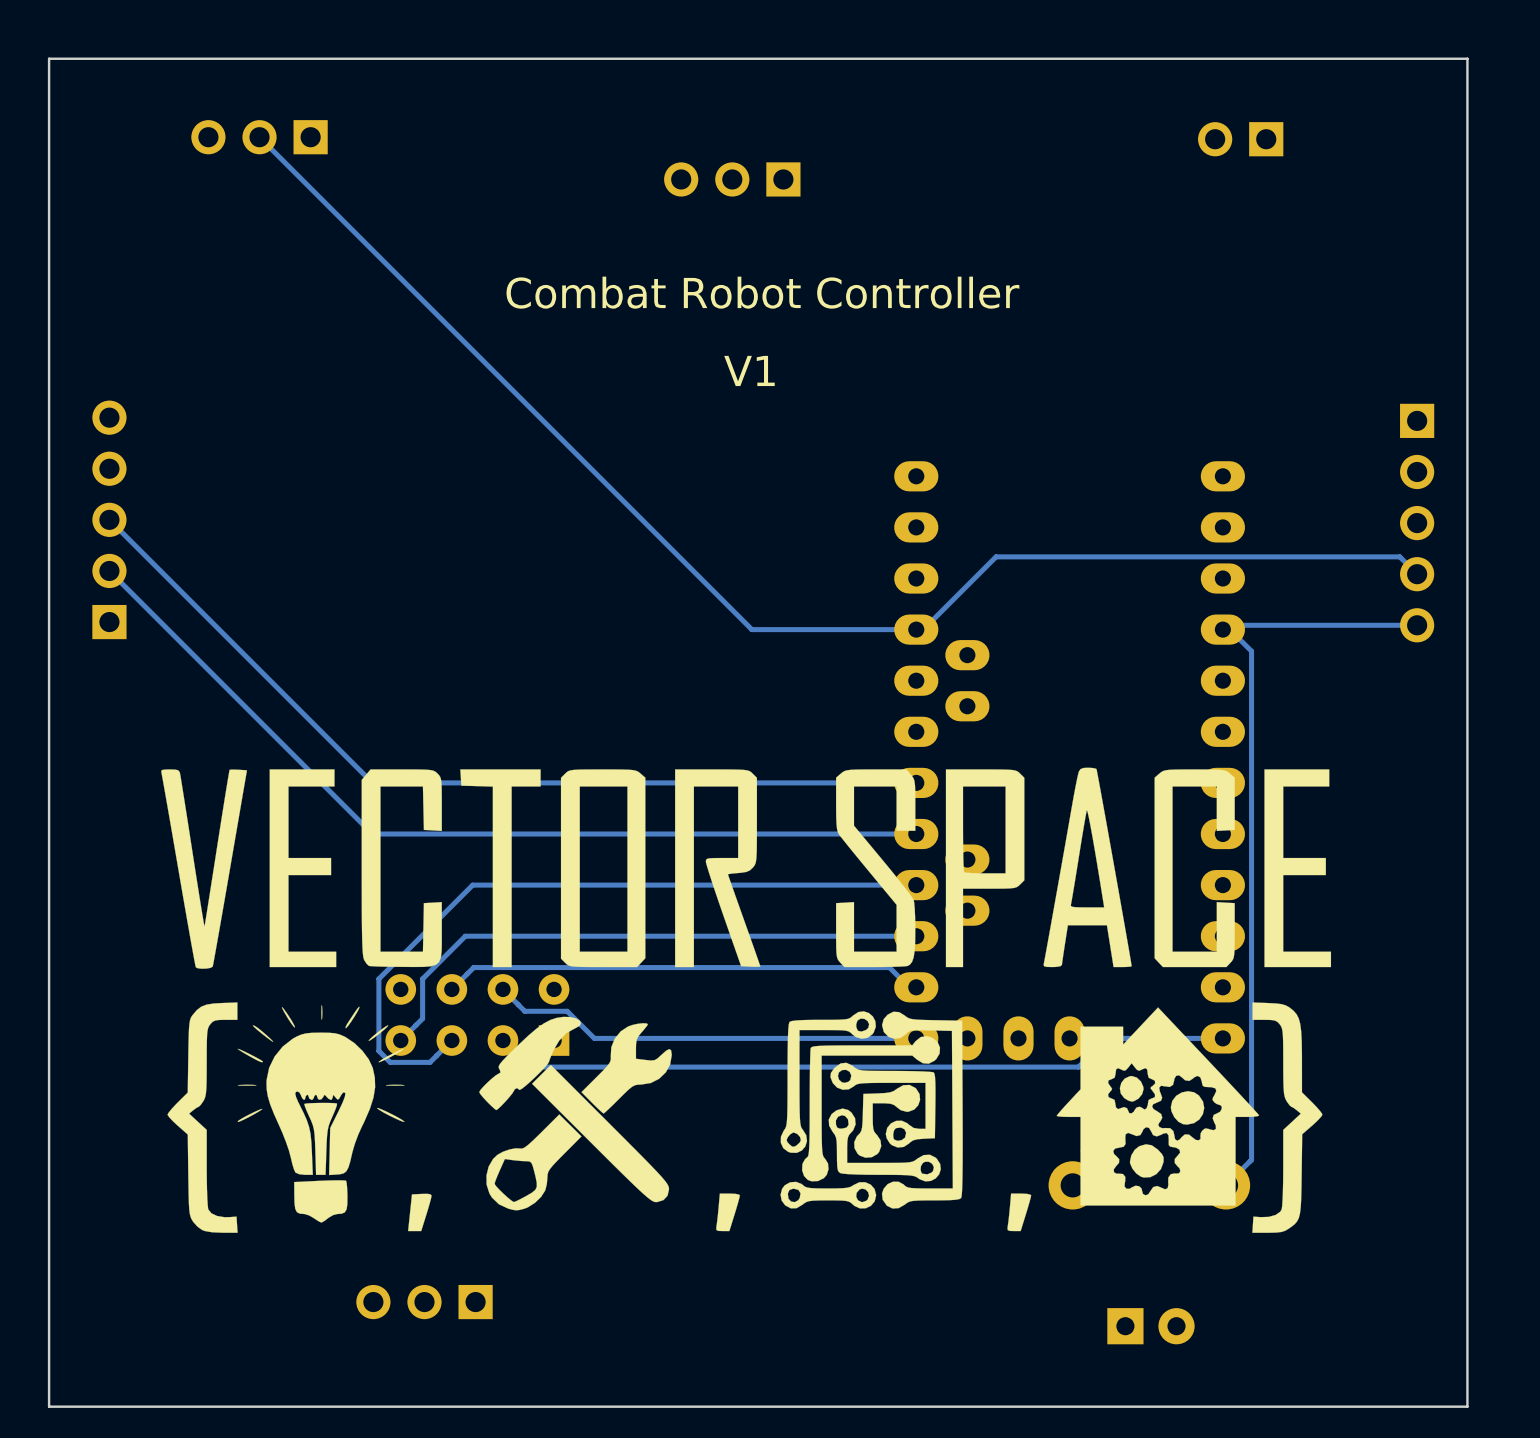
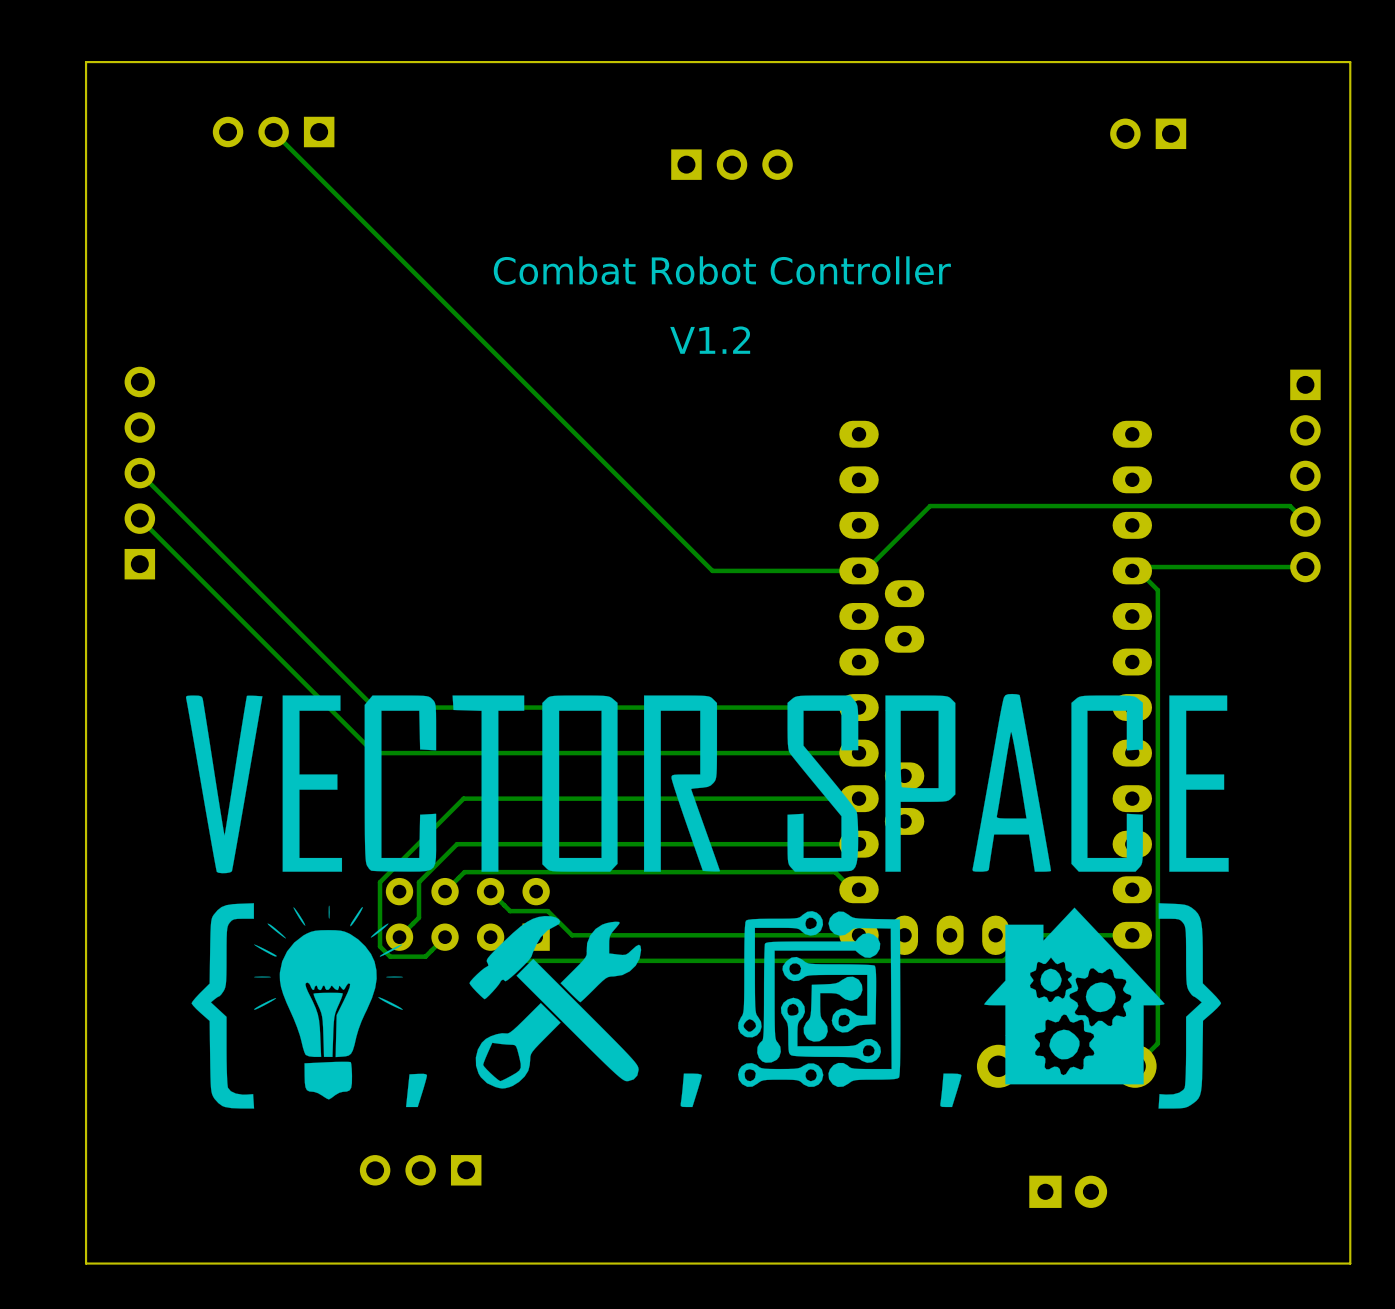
part rotation: 0° (732, 179) -> 180° (732, 164)
text: V1 (749, 370) -> V1.2 (710, 340)

